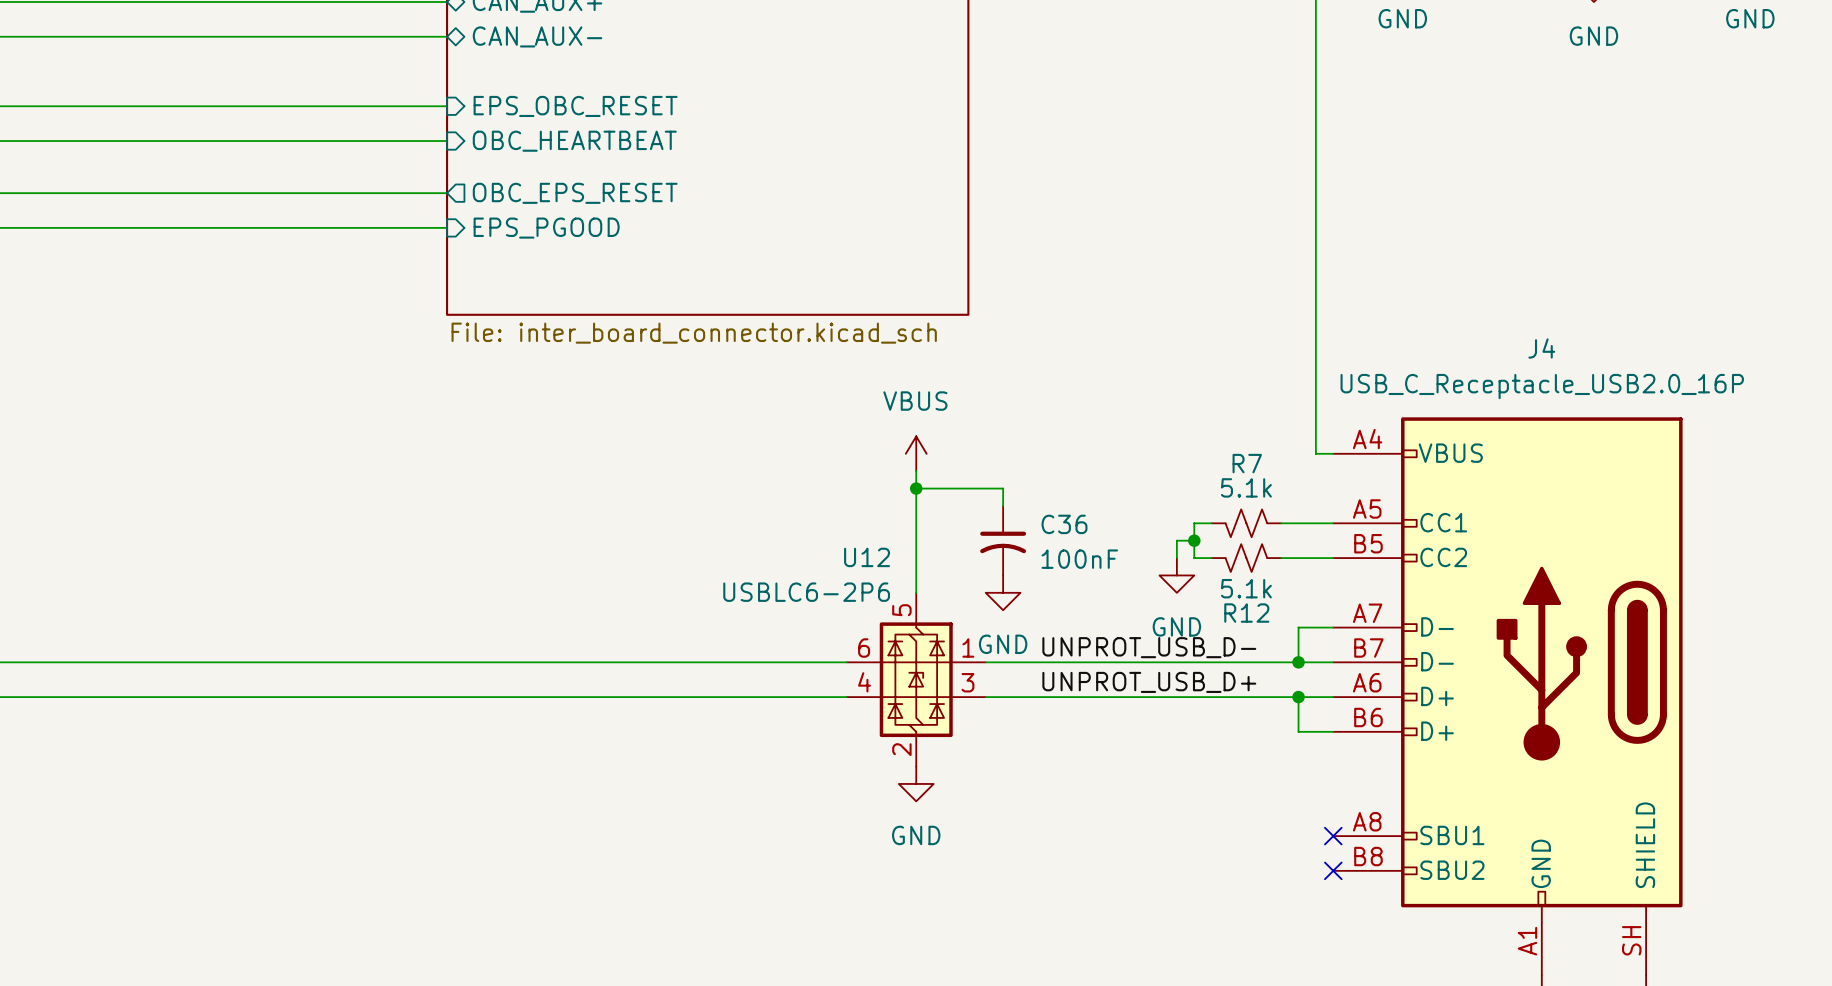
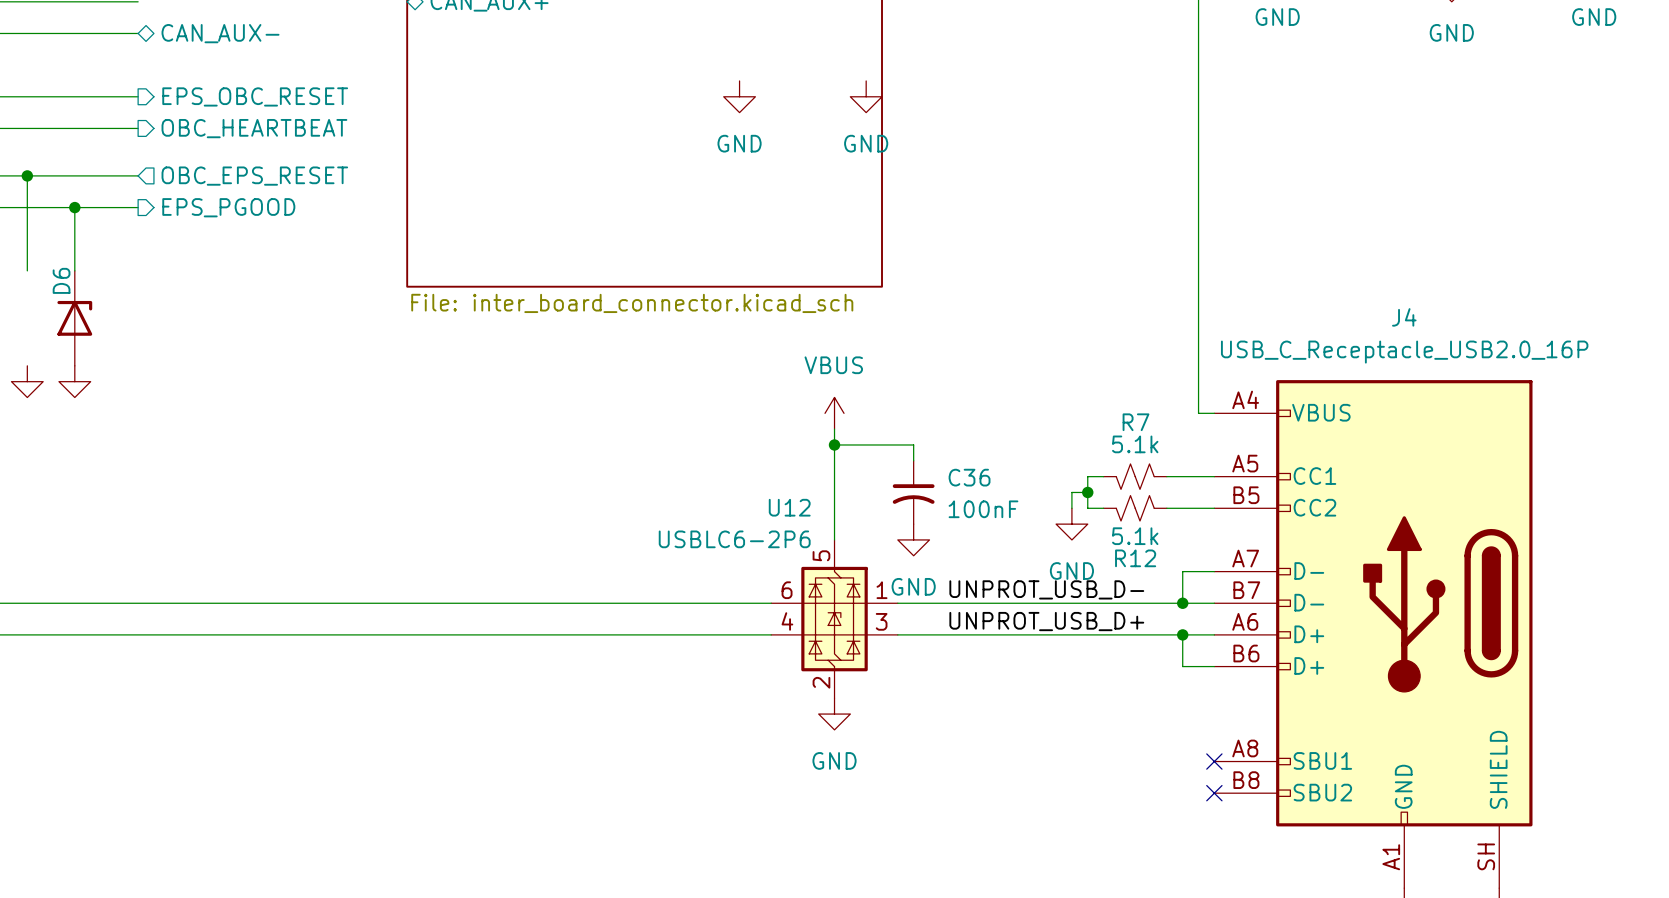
wire: (151, 2) (447, 2) -> none
wire: (151, 36) (447, 36) -> none
sheet pin position: CAN_AUX- (537, 36) -> CAN_AUX- (220, 33)
wire: (151, 106) (447, 106) -> none
sheet pin position: EPS_OBC_RESET (575, 106) -> EPS_OBC_RESET (255, 96)
power symbol: none -> GND (739, 96)
power symbol: none -> GND (866, 96)
wire: (151, 141) (447, 141) -> none
sheet pin position: OBC_HEARTBEAT (574, 141) -> OBC_HEARTBEAT (254, 128)
wire: none -> (27, 175) (27, 270)
junction: none -> (27, 175)
wire: (151, 193) (447, 193) -> none
sheet pin position: OBC_EPS_RESET (575, 193) -> OBC_EPS_RESET (254, 176)
wire: none -> (74, 207) (74, 270)
junction: none -> (74, 207)
wire: (151, 227) (447, 227) -> none
sheet pin position: EPS_PGOOD (546, 228) -> EPS_PGOOD (228, 207)
D6: none -> (74, 318)
power symbol: none -> (27, 381)
power symbol: none -> (74, 381)

